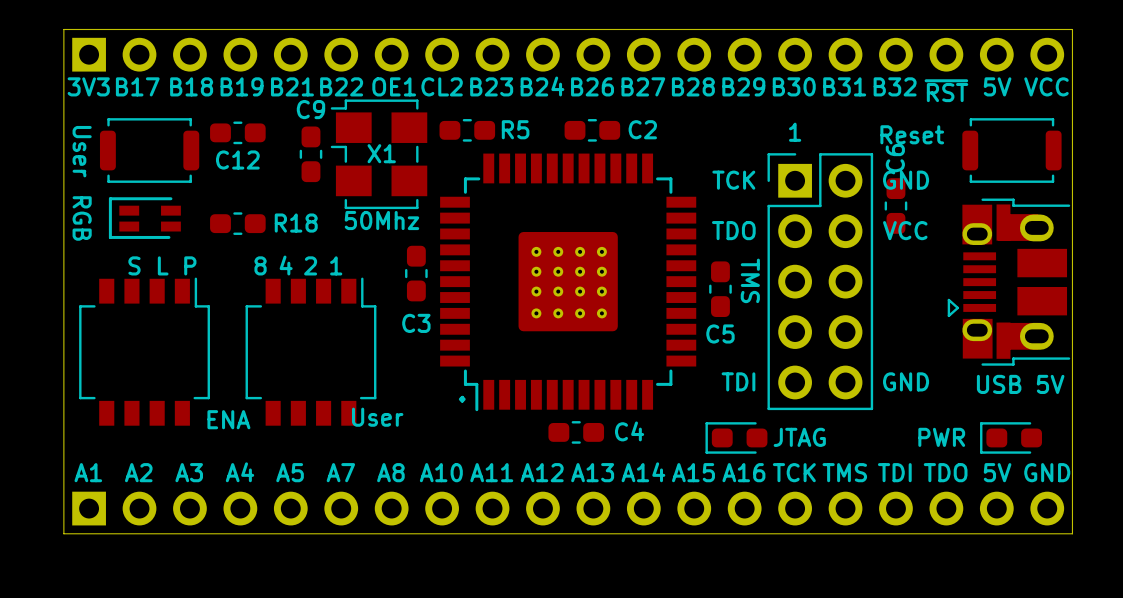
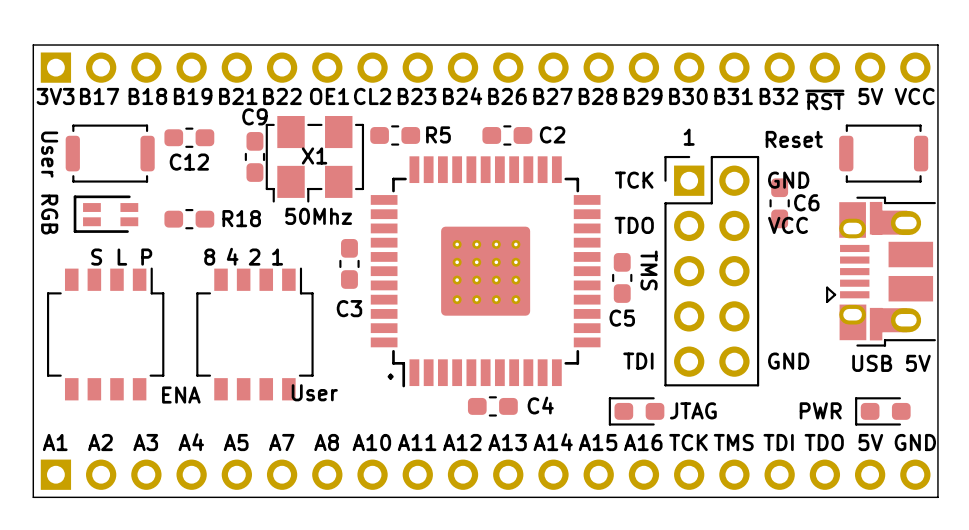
X1 rotation: 0° (379, 154) -> 90° counterclockwise (314, 159)
C6 name rotation: 0° (895, 158) -> 90° clockwise (806, 202)
C6 name position: C6 (895, 158) -> C6 (806, 202)

